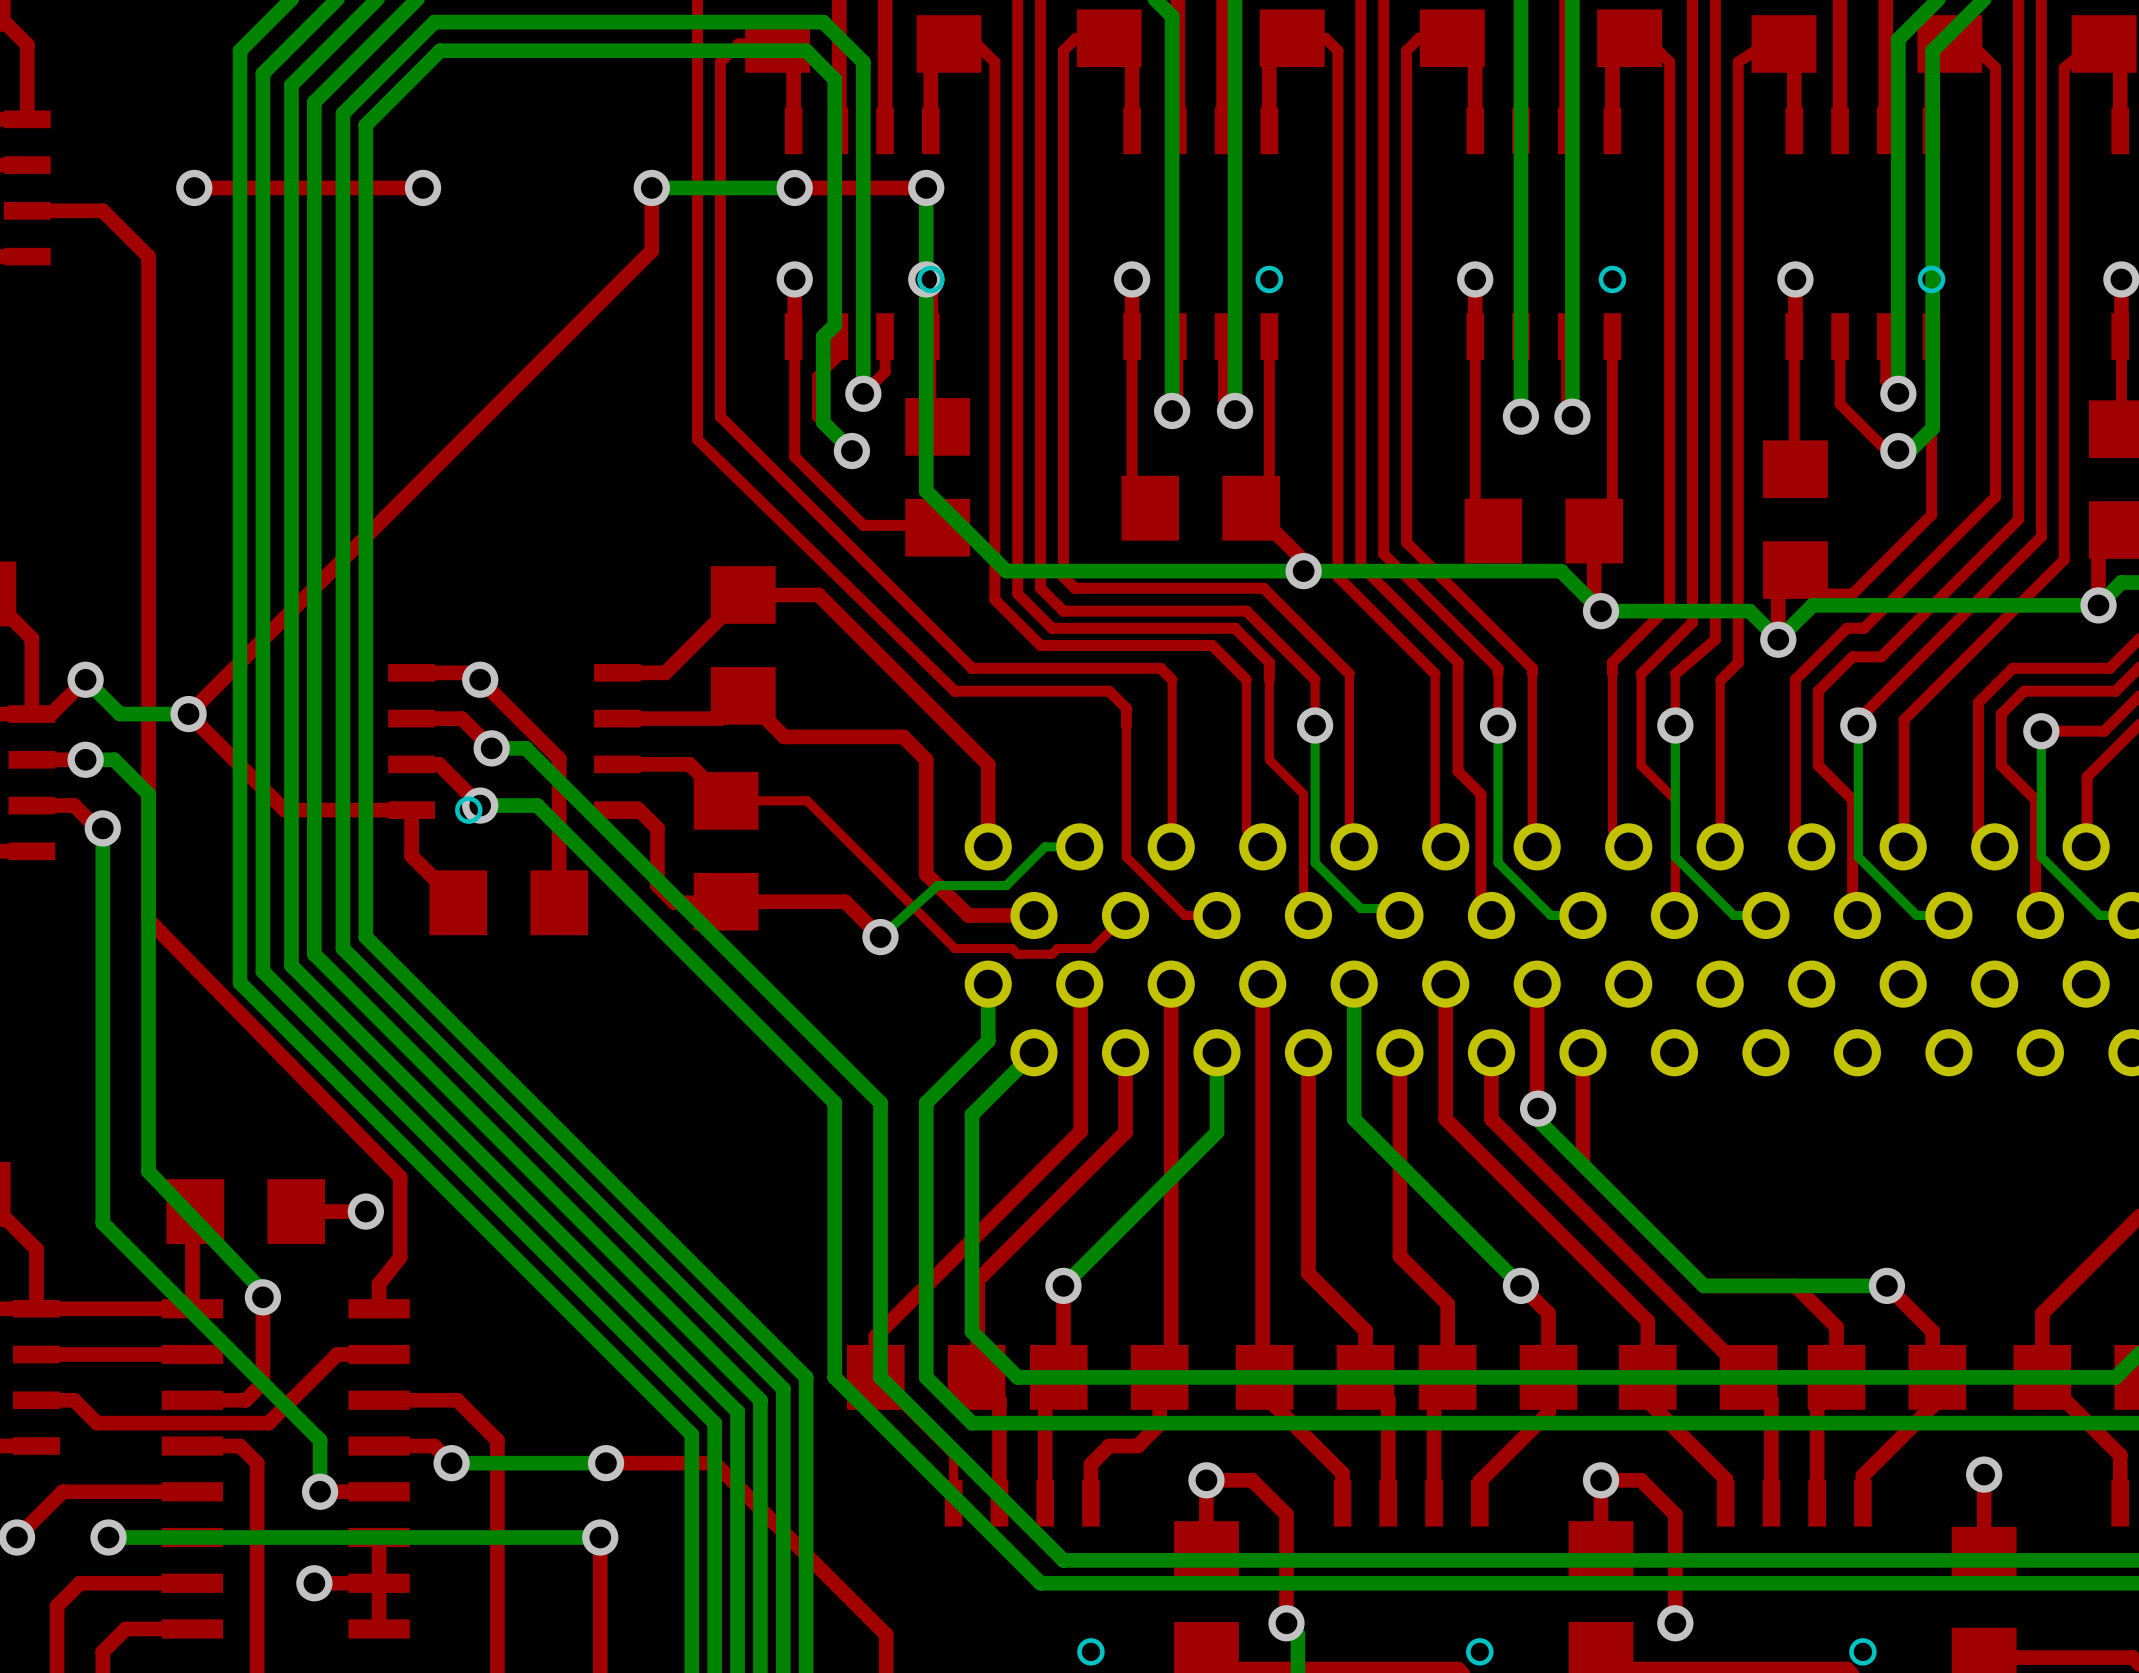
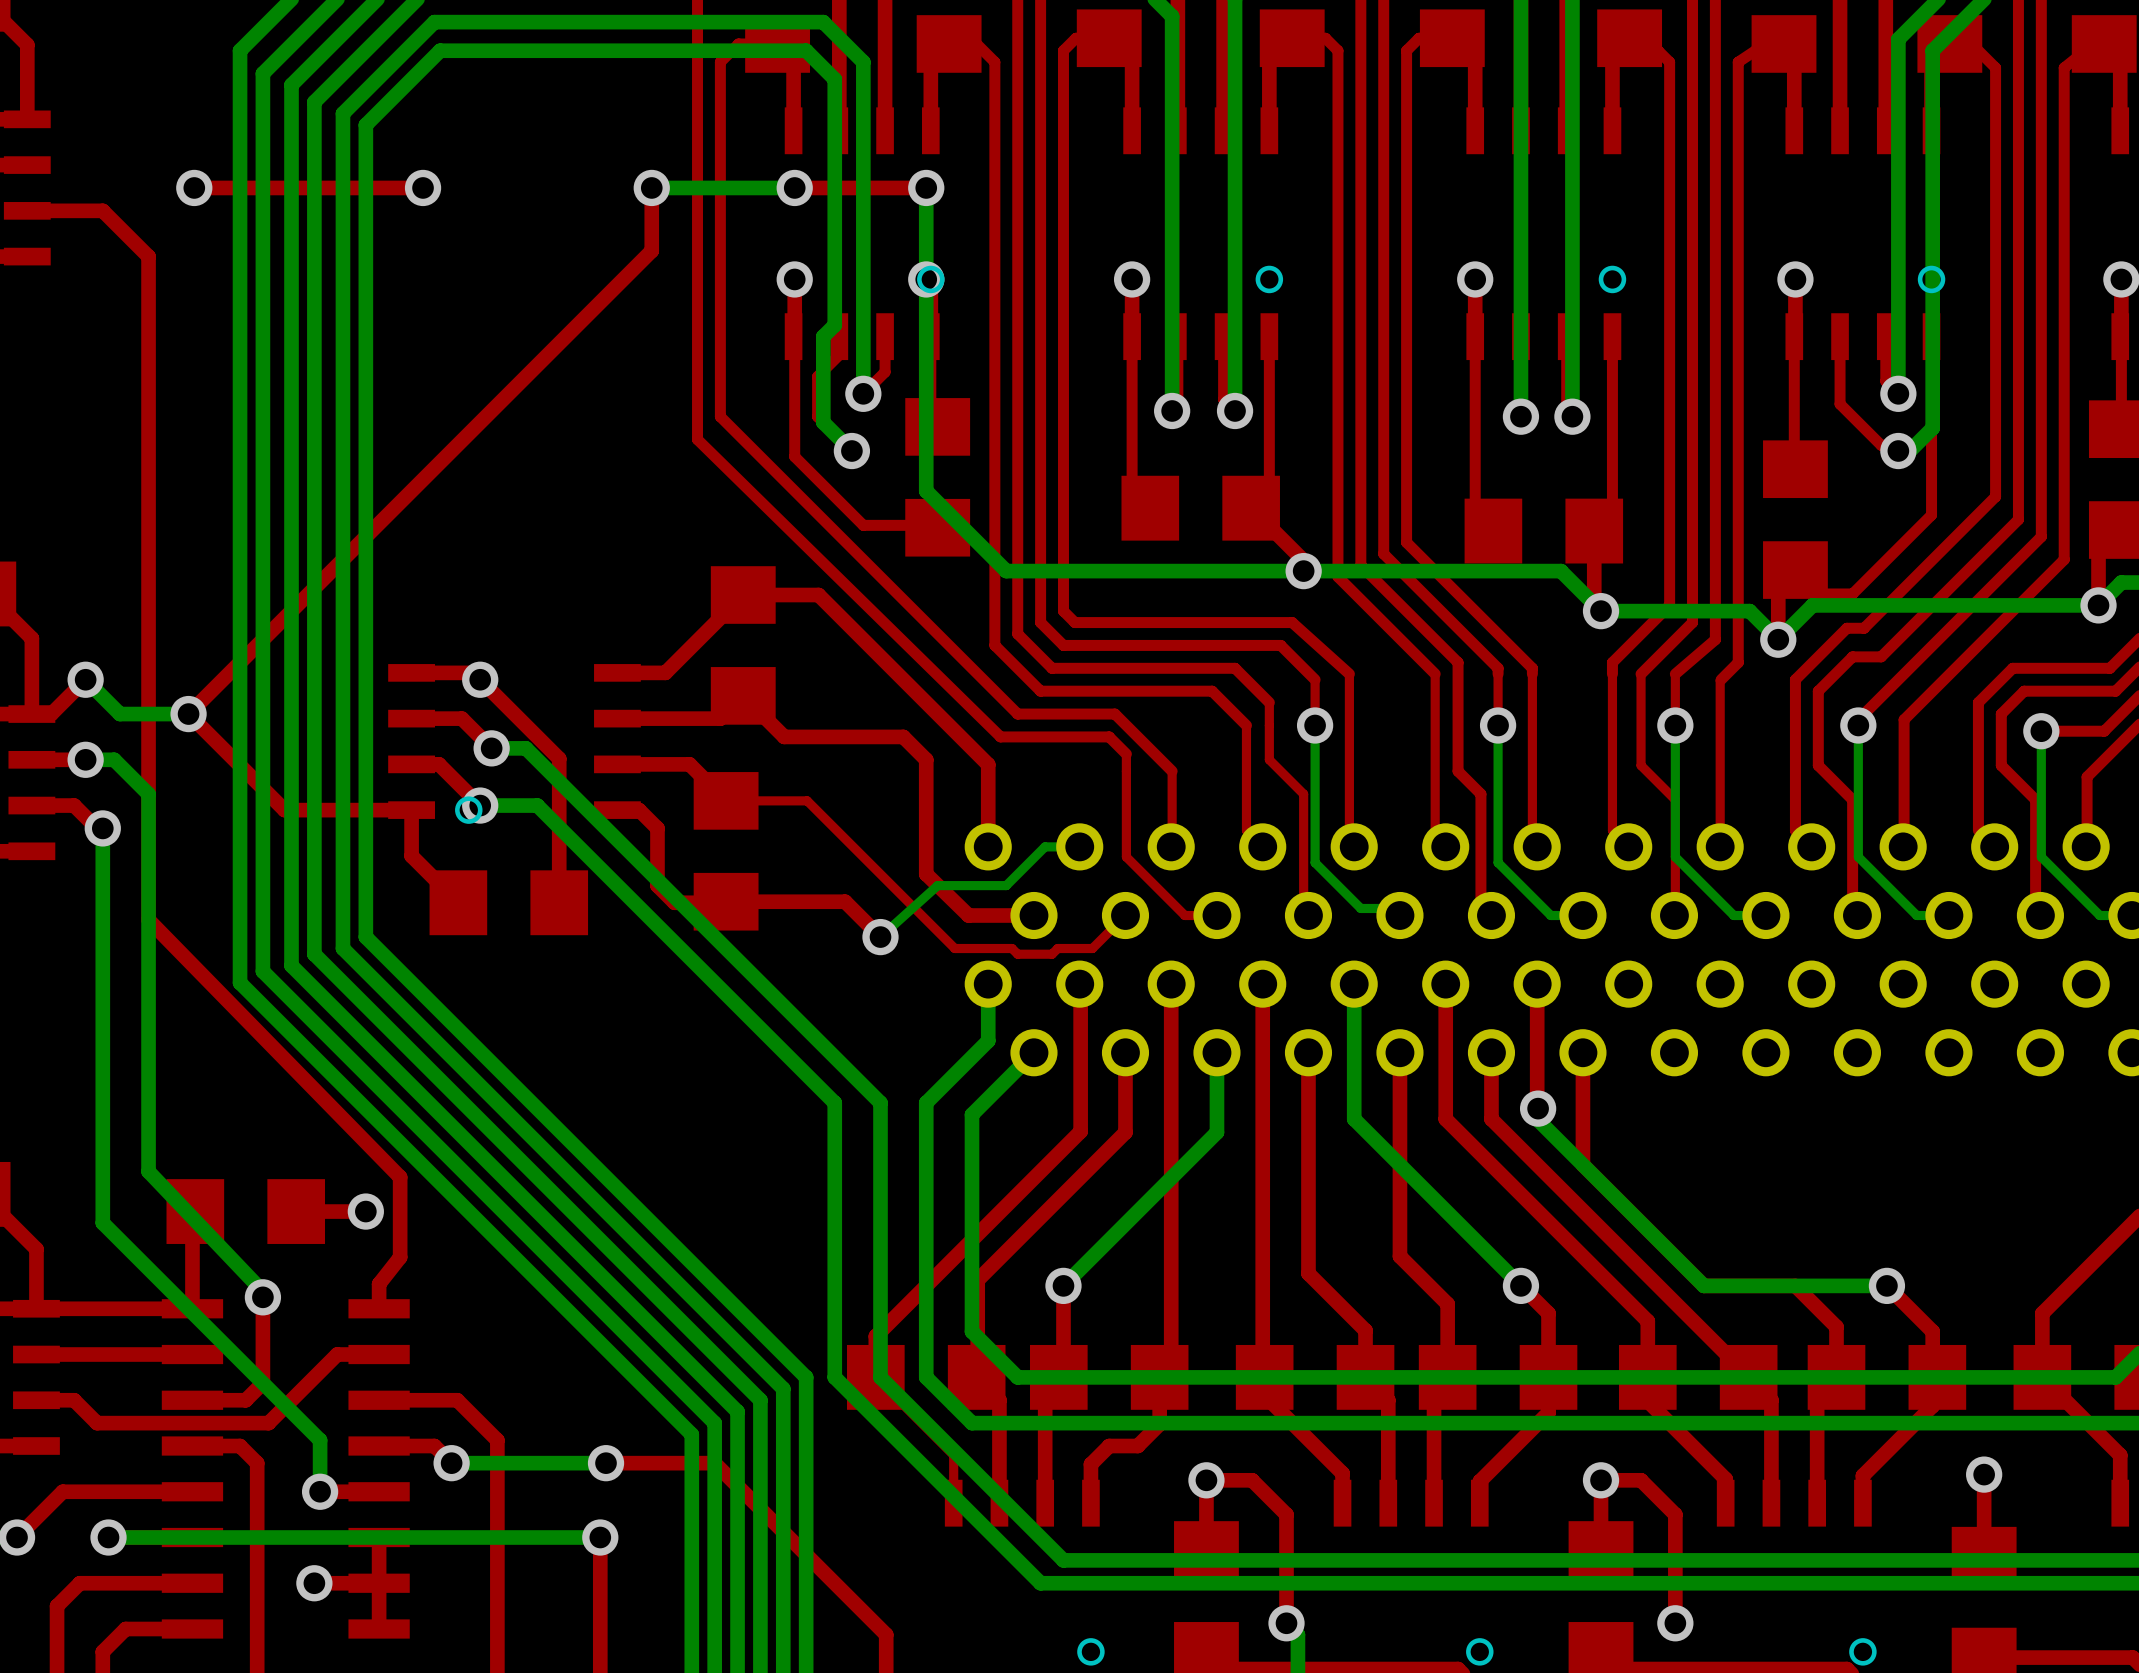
top track: (697, 439) (954, 691) (1040, 691) -> (697, 439) (1000, 736) (1109, 736) (1126, 754)
top track: (1063, 576) (1074, 588) (1263, 588) (1349, 674) -> (1063, 576) (1063, 611) (1074, 622) (1292, 622) (1349, 674)
top track: (1040, 588) (1063, 611) (1246, 611) (1280, 645) -> none
top track: (1017, 593) (1052, 628) (1235, 628) (1269, 662) (1269, 702) -> none
top track: (994, 599) (1040, 645) (1063, 645) -> (1040, 588) (1040, 622) (1063, 645)
top track: none -> (994, 599) (994, 645) (1040, 691)
top track: (1212, 645) (1235, 668) -> (1212, 645) (1280, 645)
top track: none -> (971, 668) (1017, 714) (1114, 714) (1172, 771)
top track: (1052, 668) (971, 668) -> (1052, 668) (1017, 634) (1017, 593)
top track: (1160, 668) (1172, 679) (1172, 771) -> (1160, 668) (1235, 668)
top track: (1246, 679) (1246, 725) -> (1246, 679) (1269, 702)
top track: (1109, 691) (1126, 708) (1126, 754) -> (1109, 691) (1212, 691) (1246, 725)

